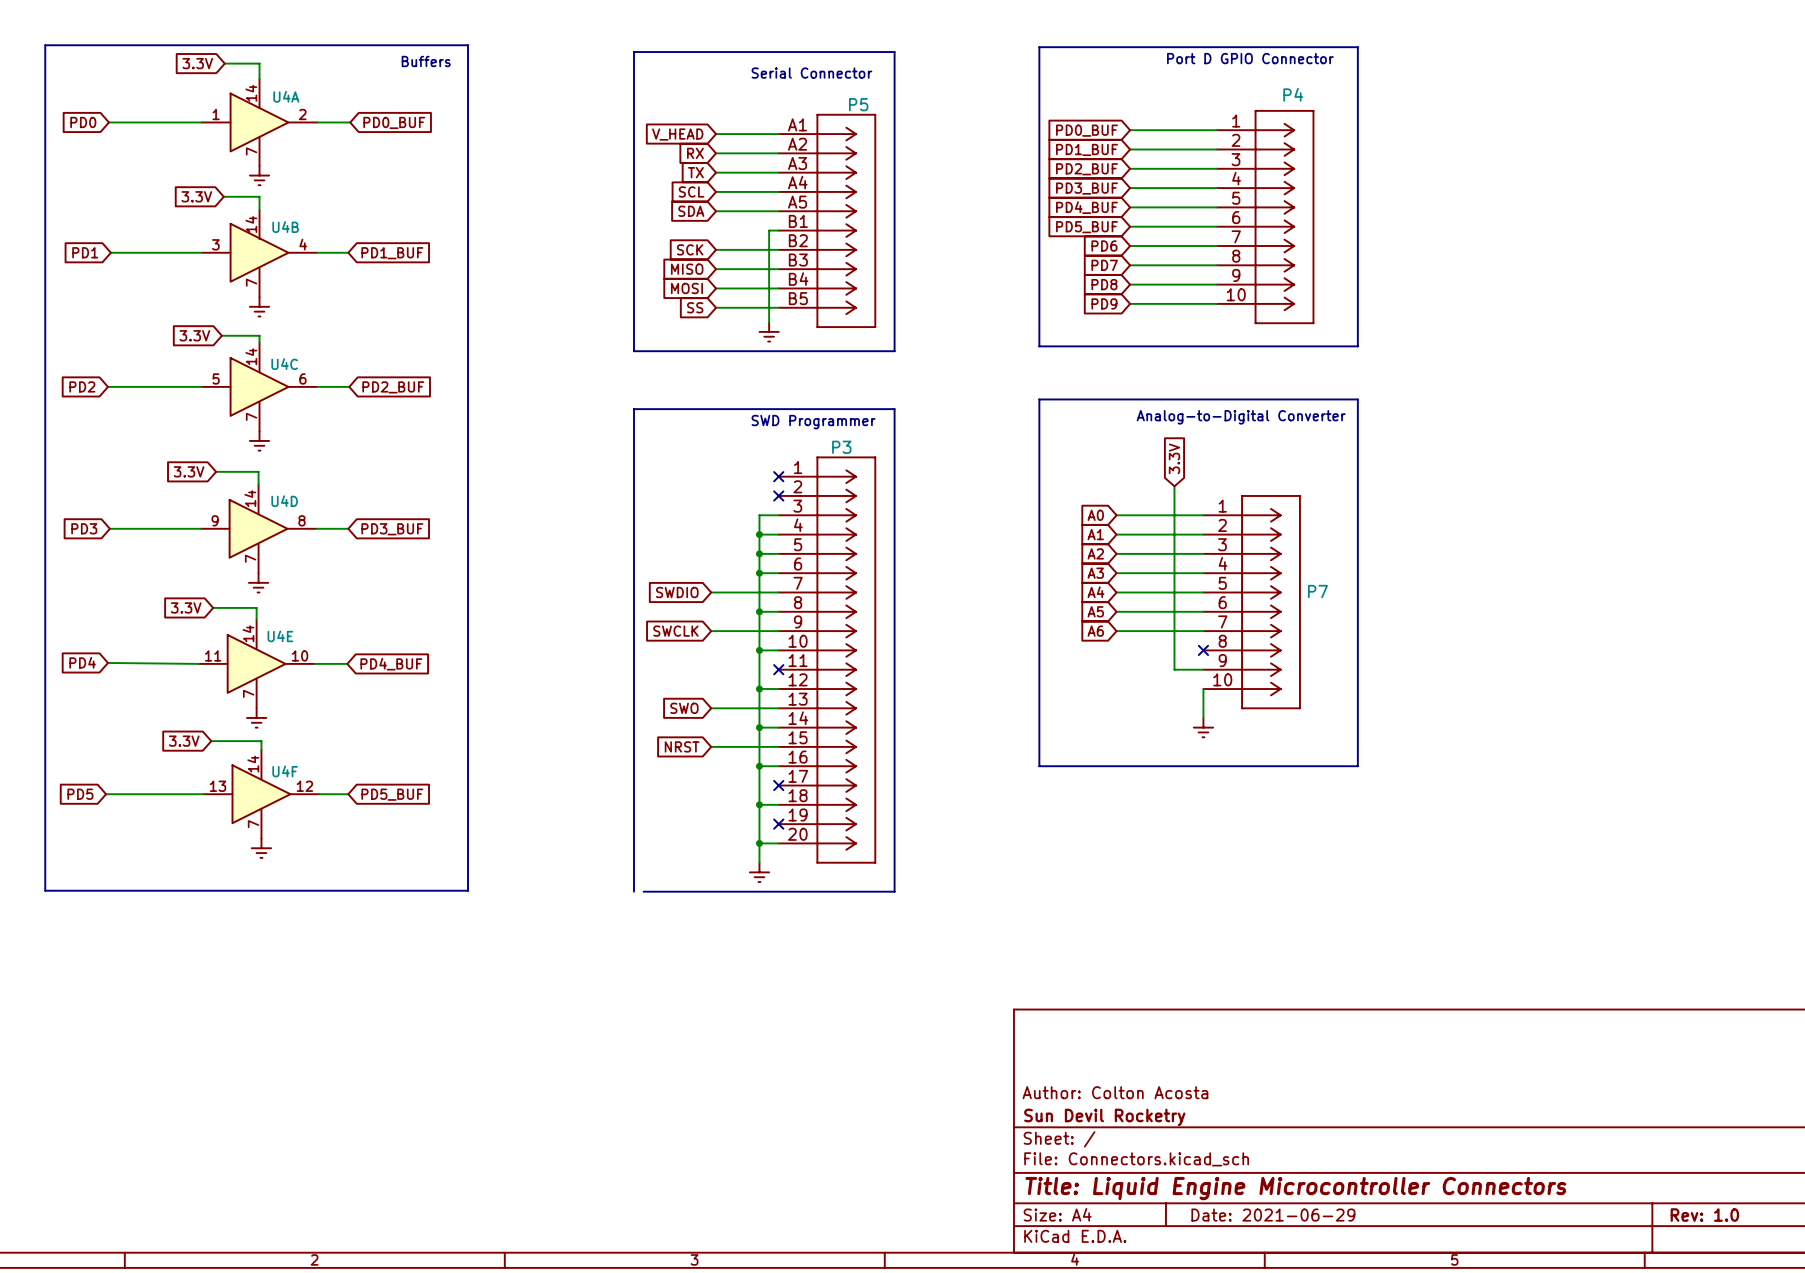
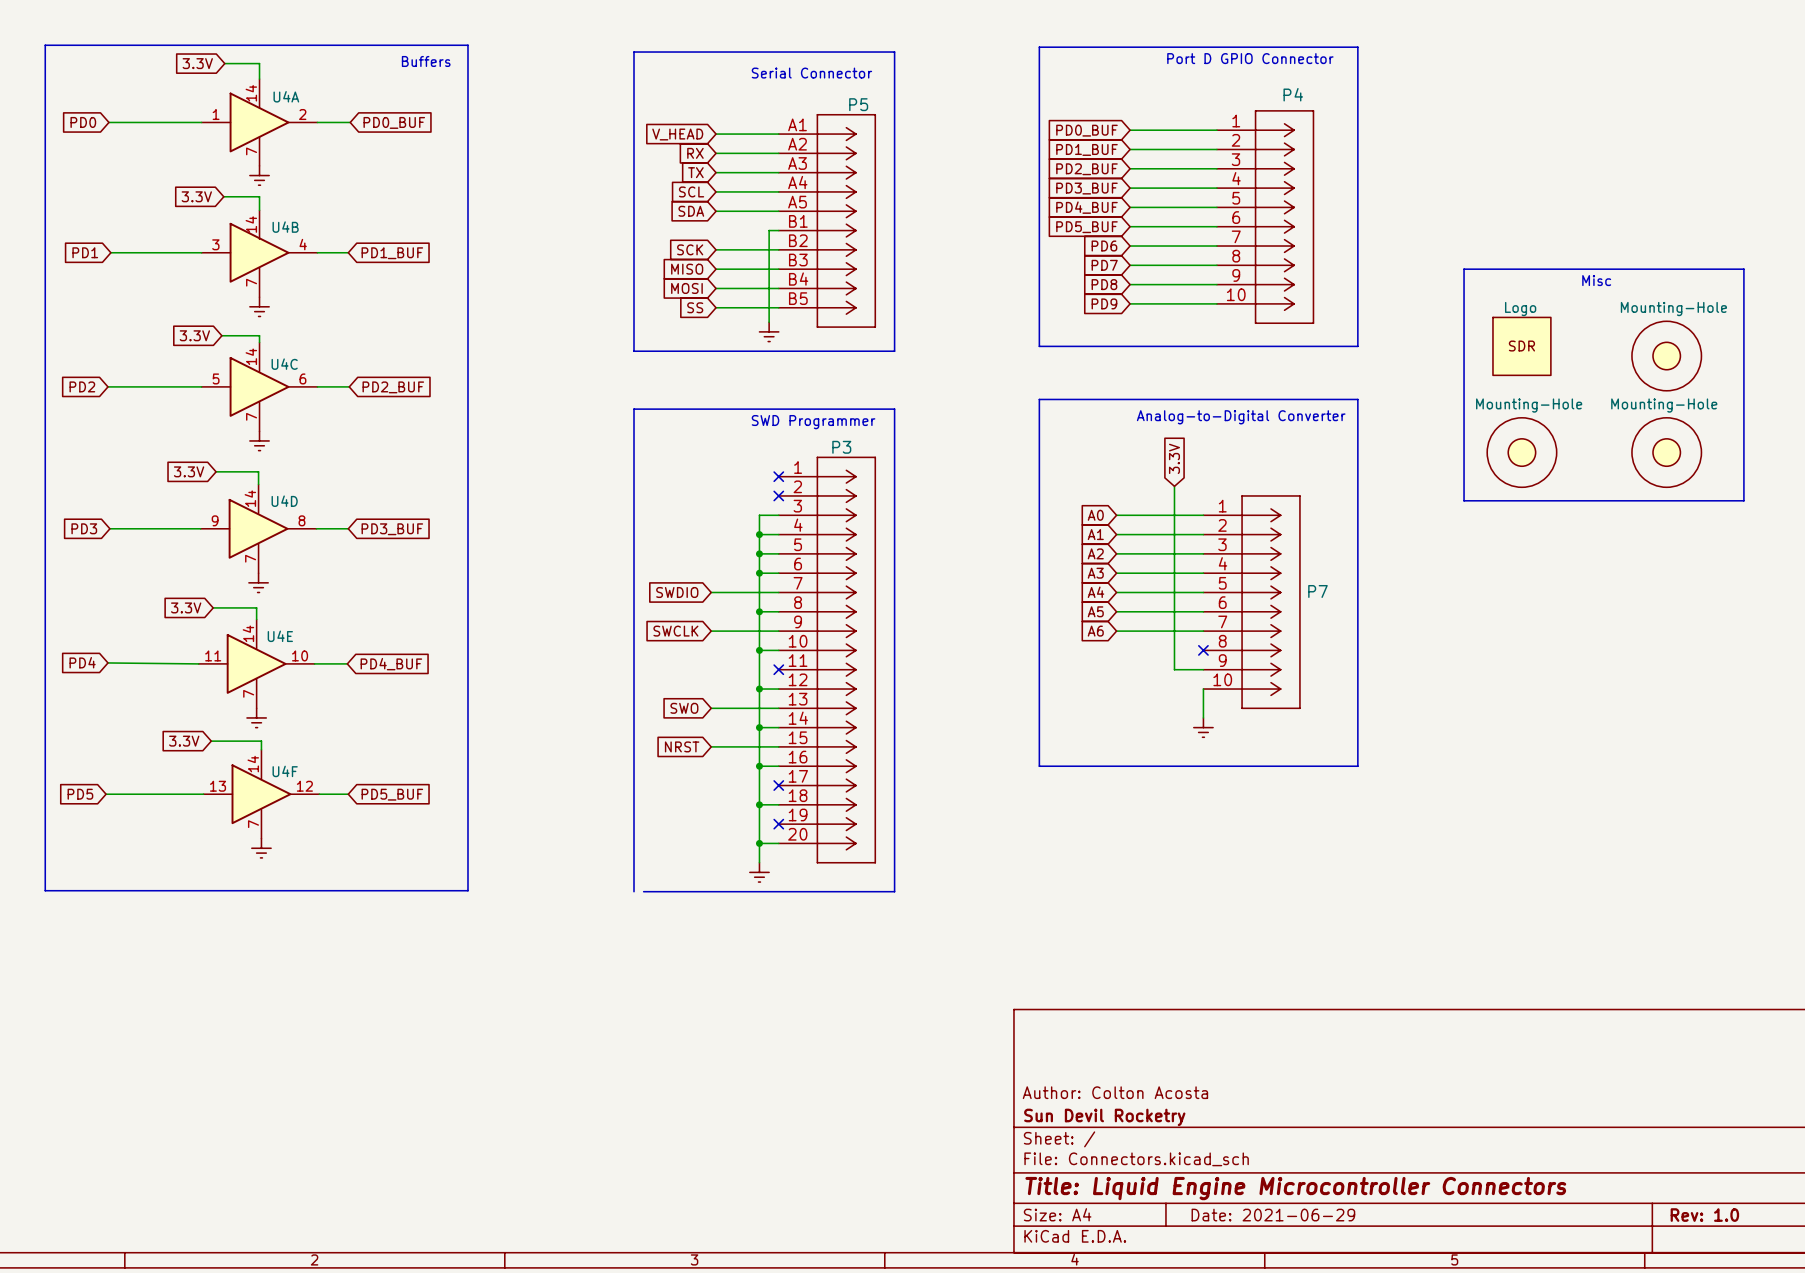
line: none -> (1464, 269) (1464, 500) (1743, 500) (1743, 269) (1464, 269)
text: none -> Misc (1596, 280)
part: none -> Logo (1521, 346)
part: none -> Mounting-Hole (1666, 356)
part: none -> Mounting-Hole (1521, 452)
part: none -> Mounting-Hole (1666, 452)

